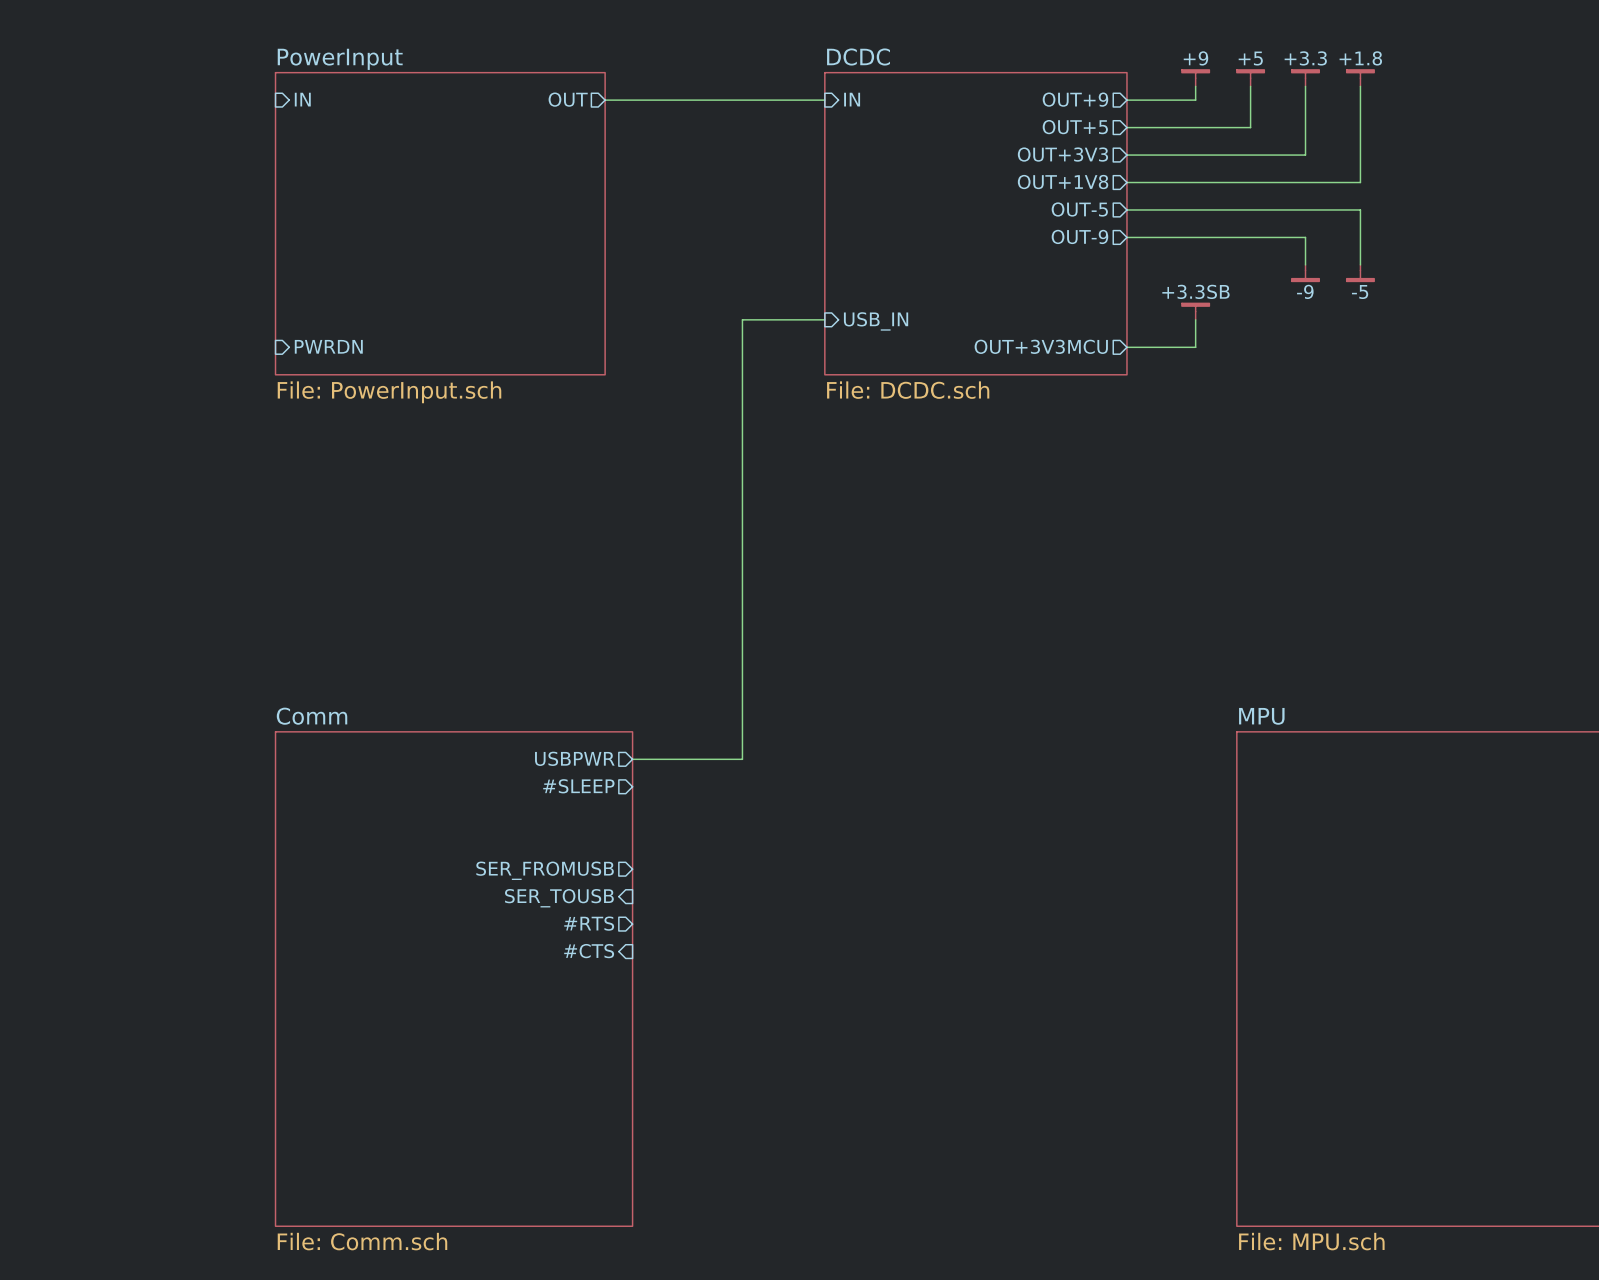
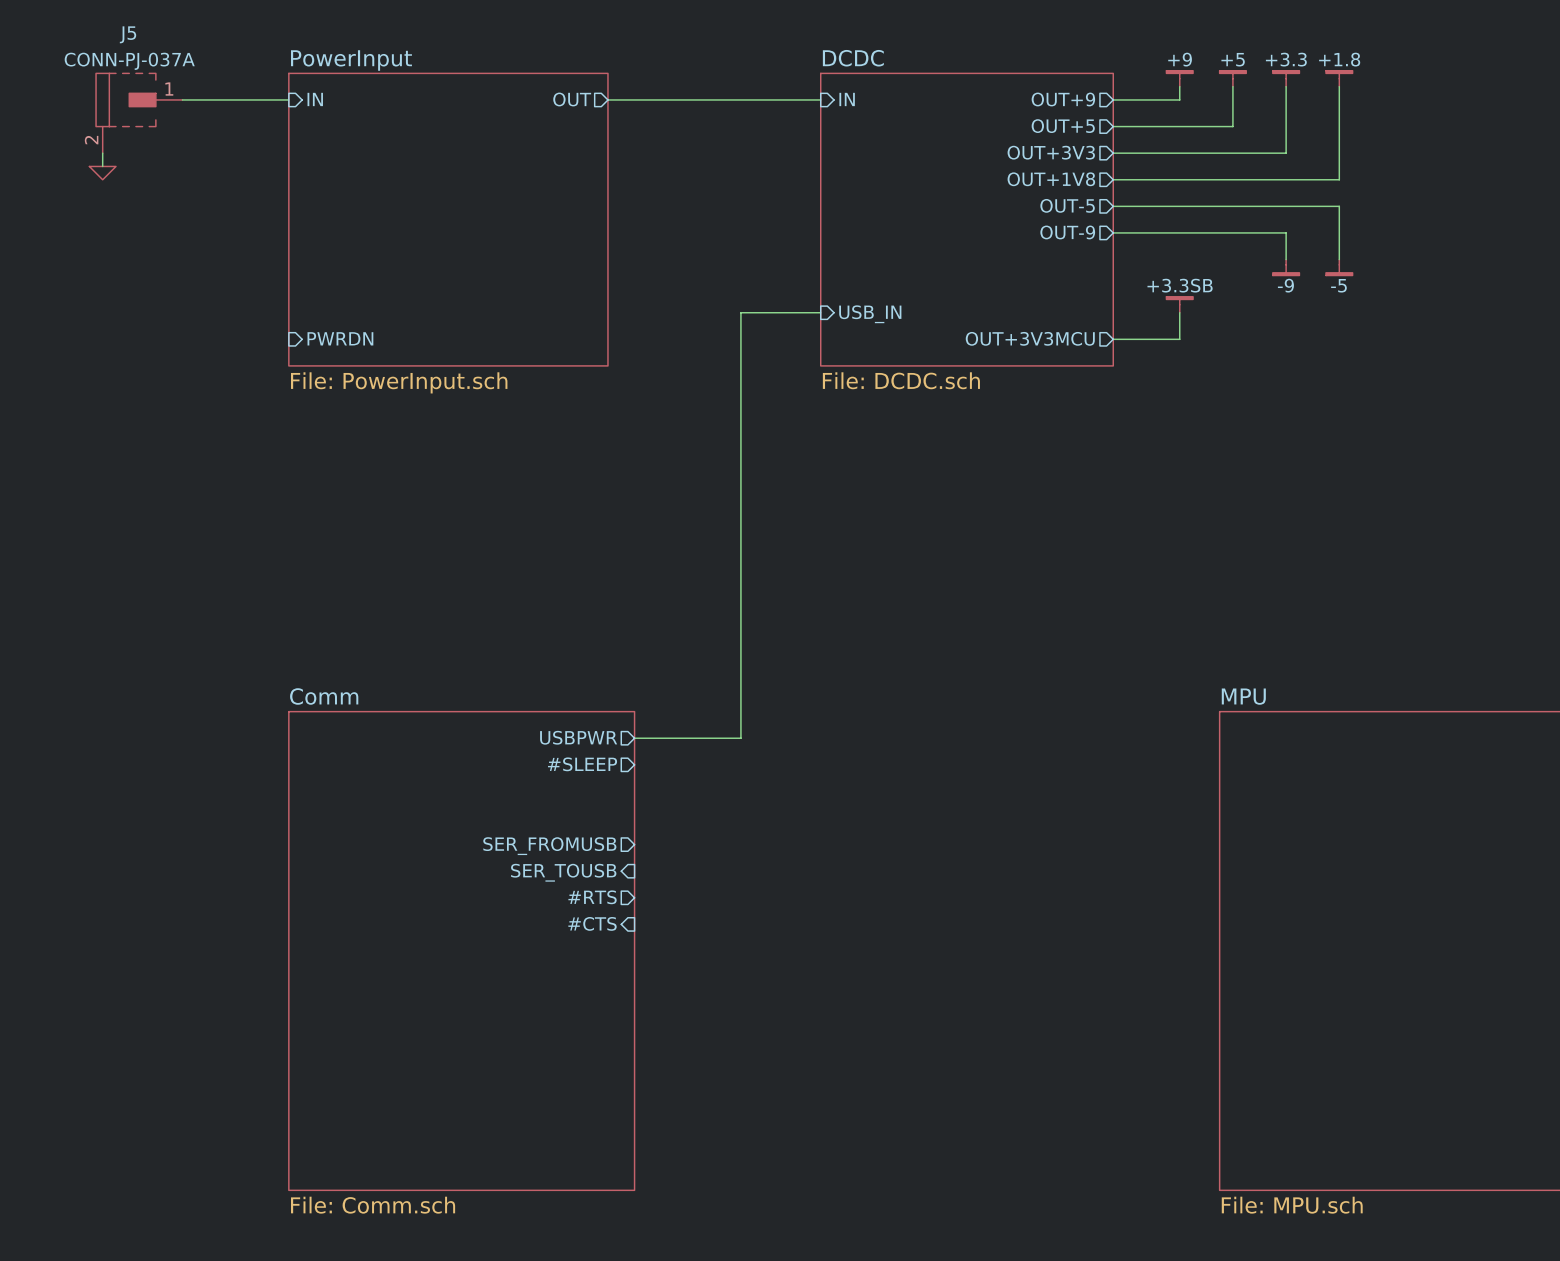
wire: none -> (182, 99) (288, 99)
J5: none -> CONN-PJ-037A (139, 113)
wire: none -> (102, 153) (102, 166)
power symbol: none -> (102, 173)

